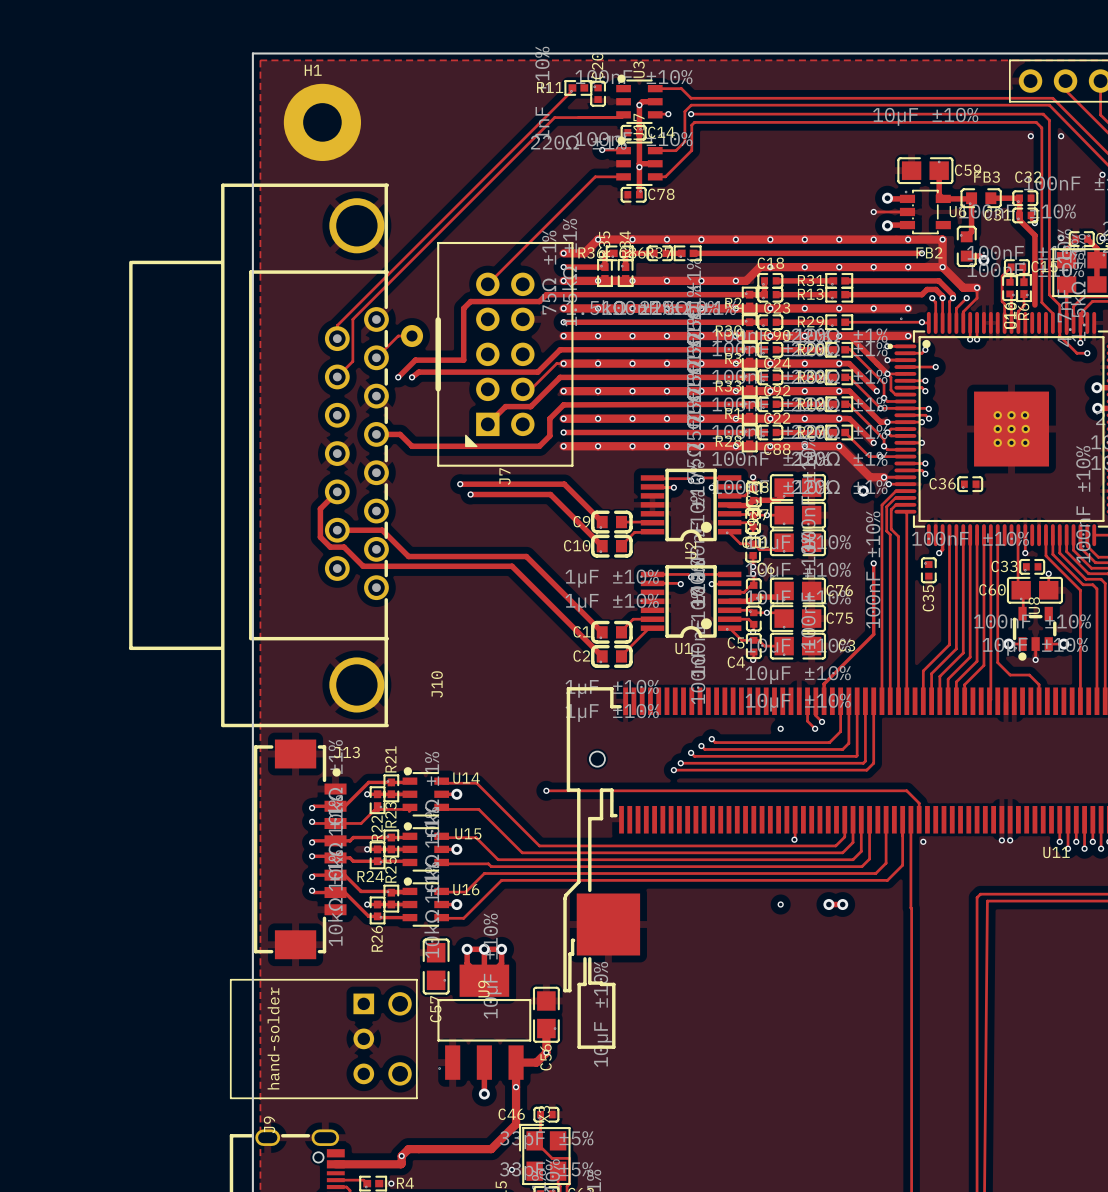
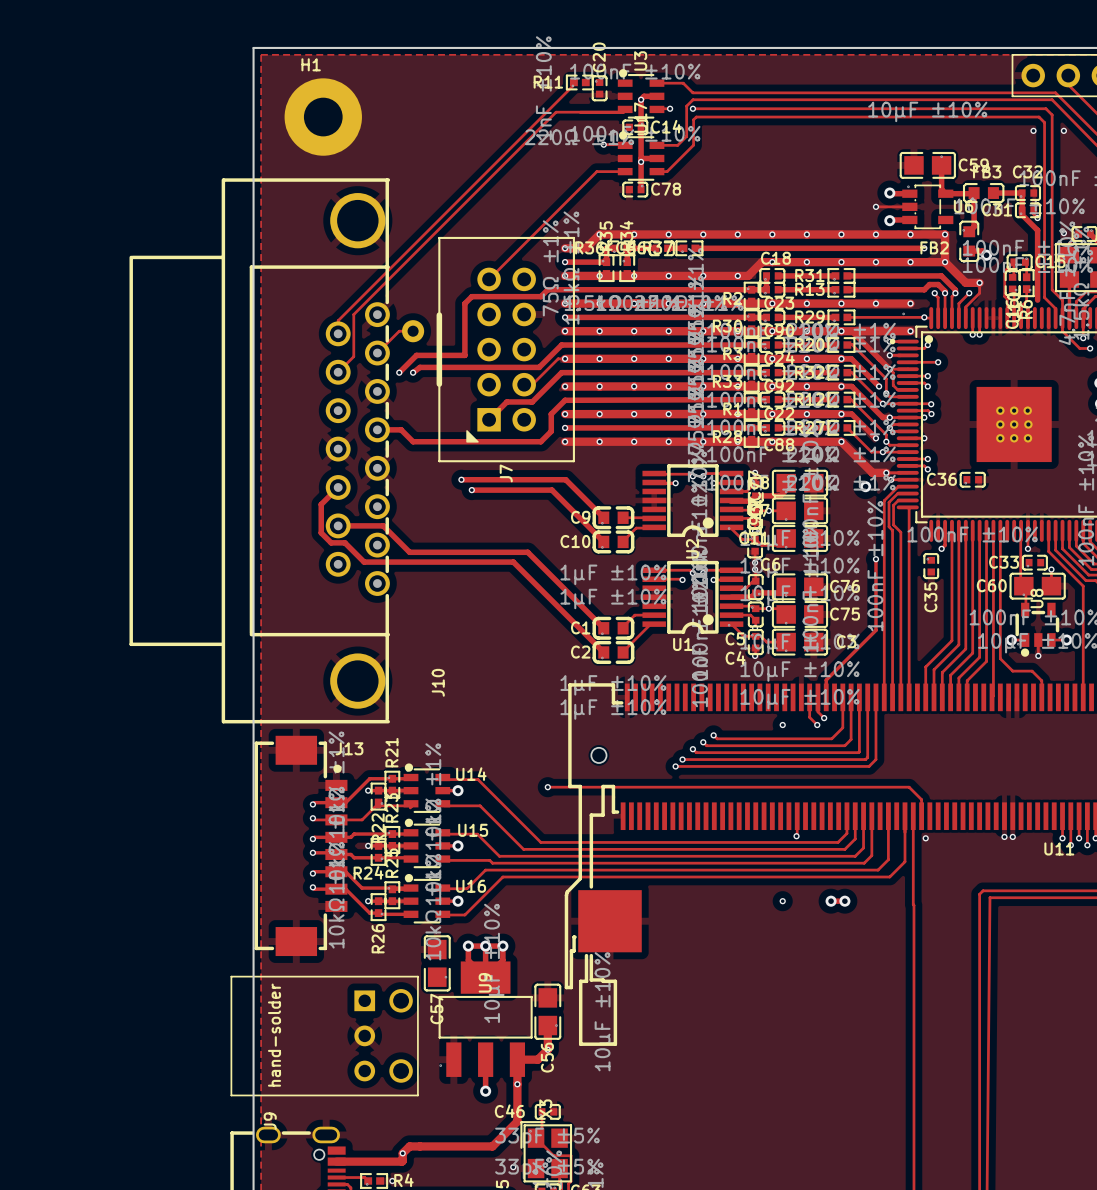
via: (804, 446) -> none

